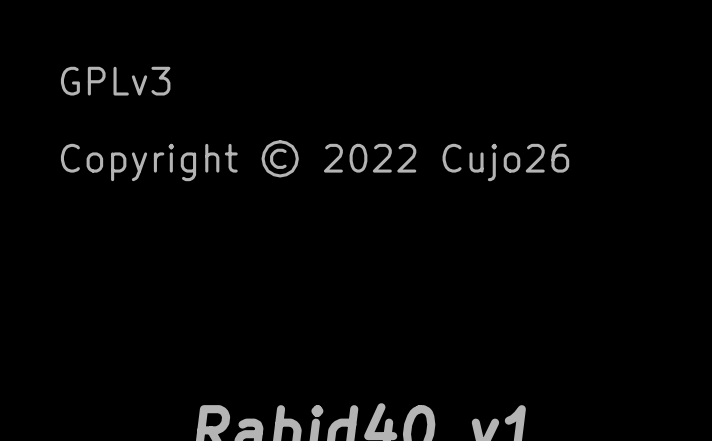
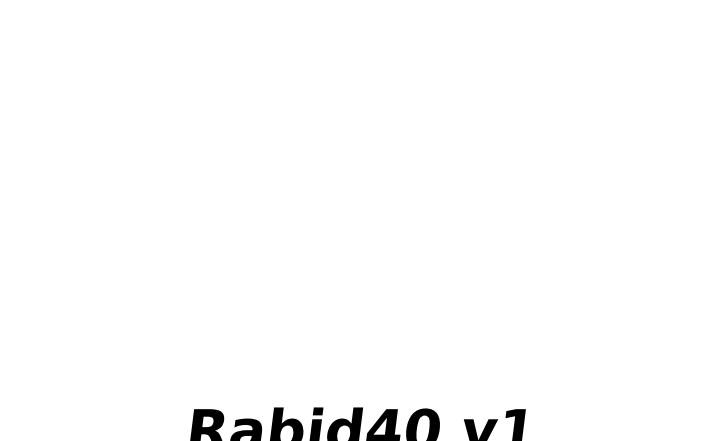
label: GPLv3 (115, 81) -> none
label: Copyright © 2022 Cujo26 (315, 160) -> none

